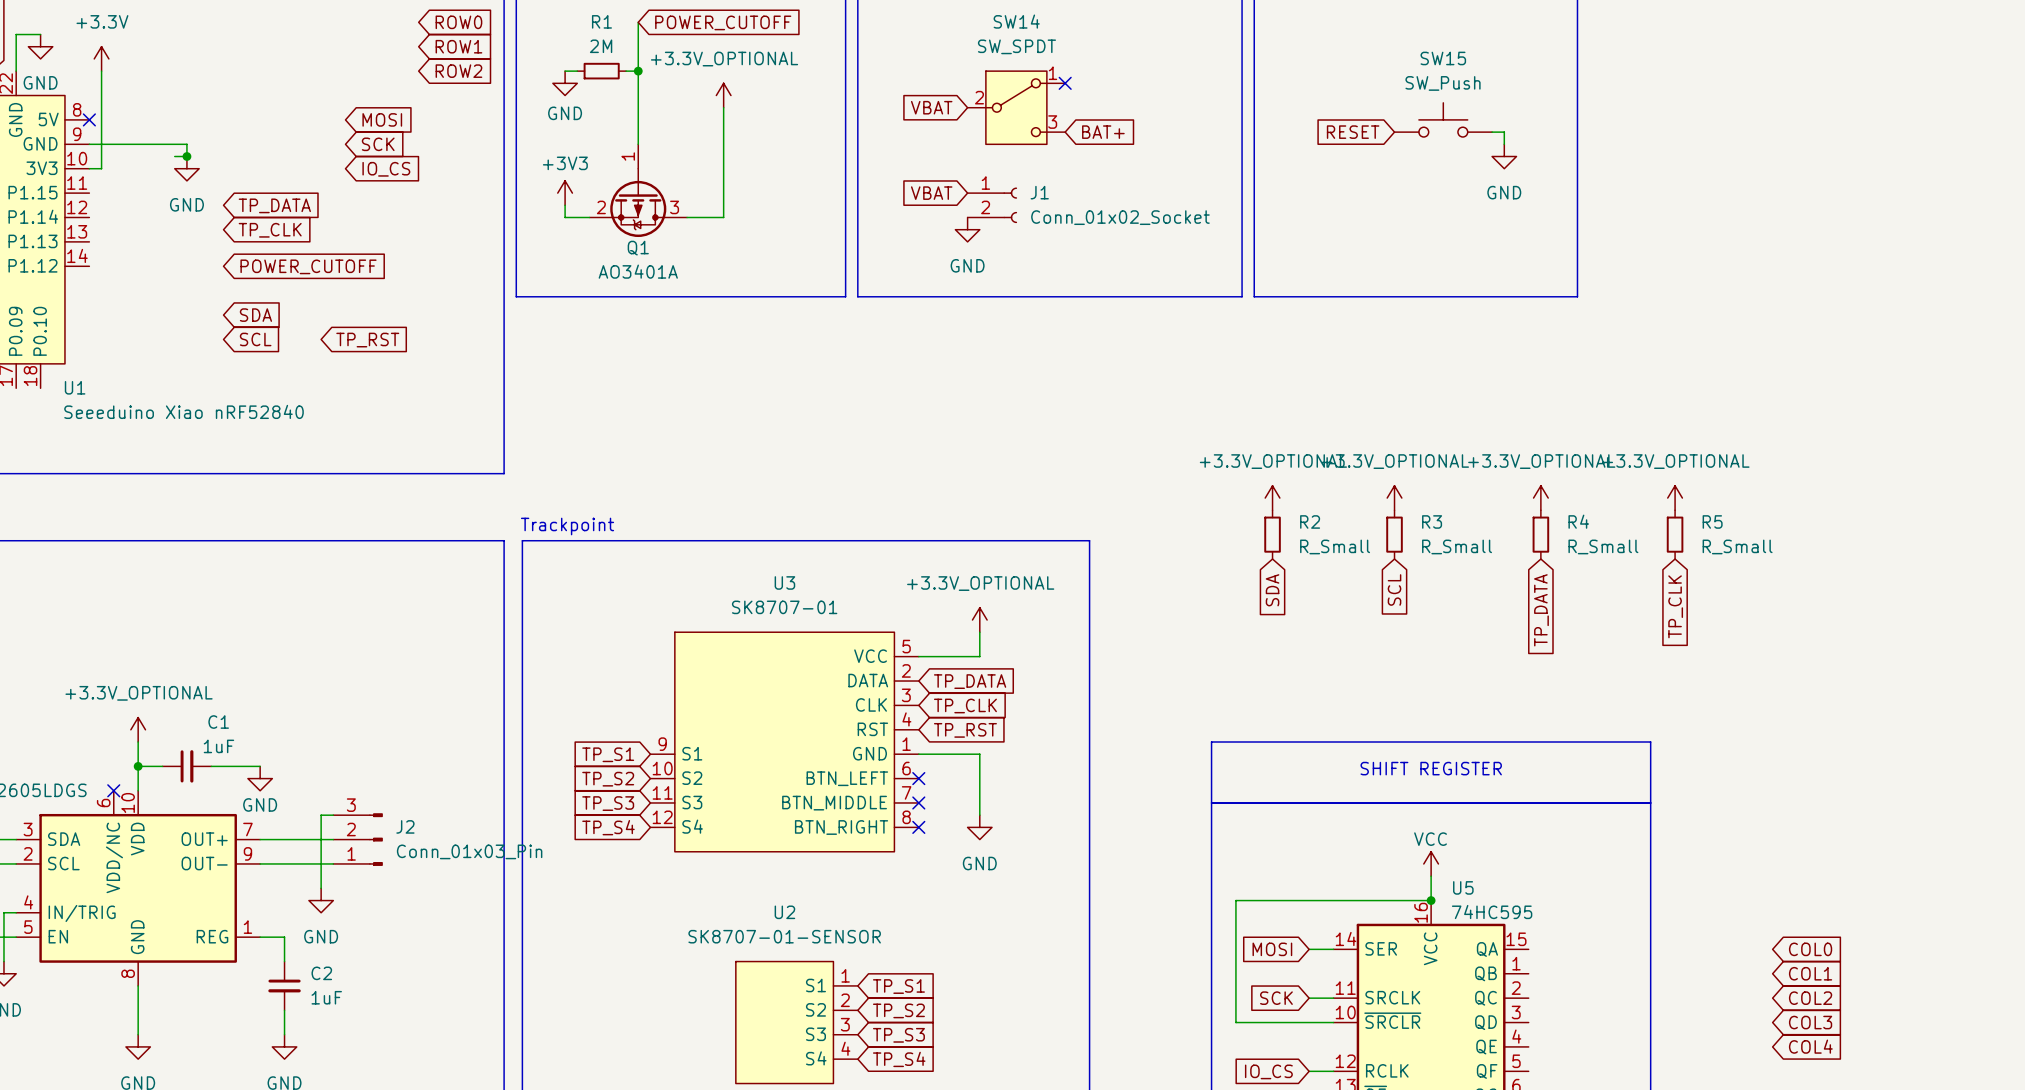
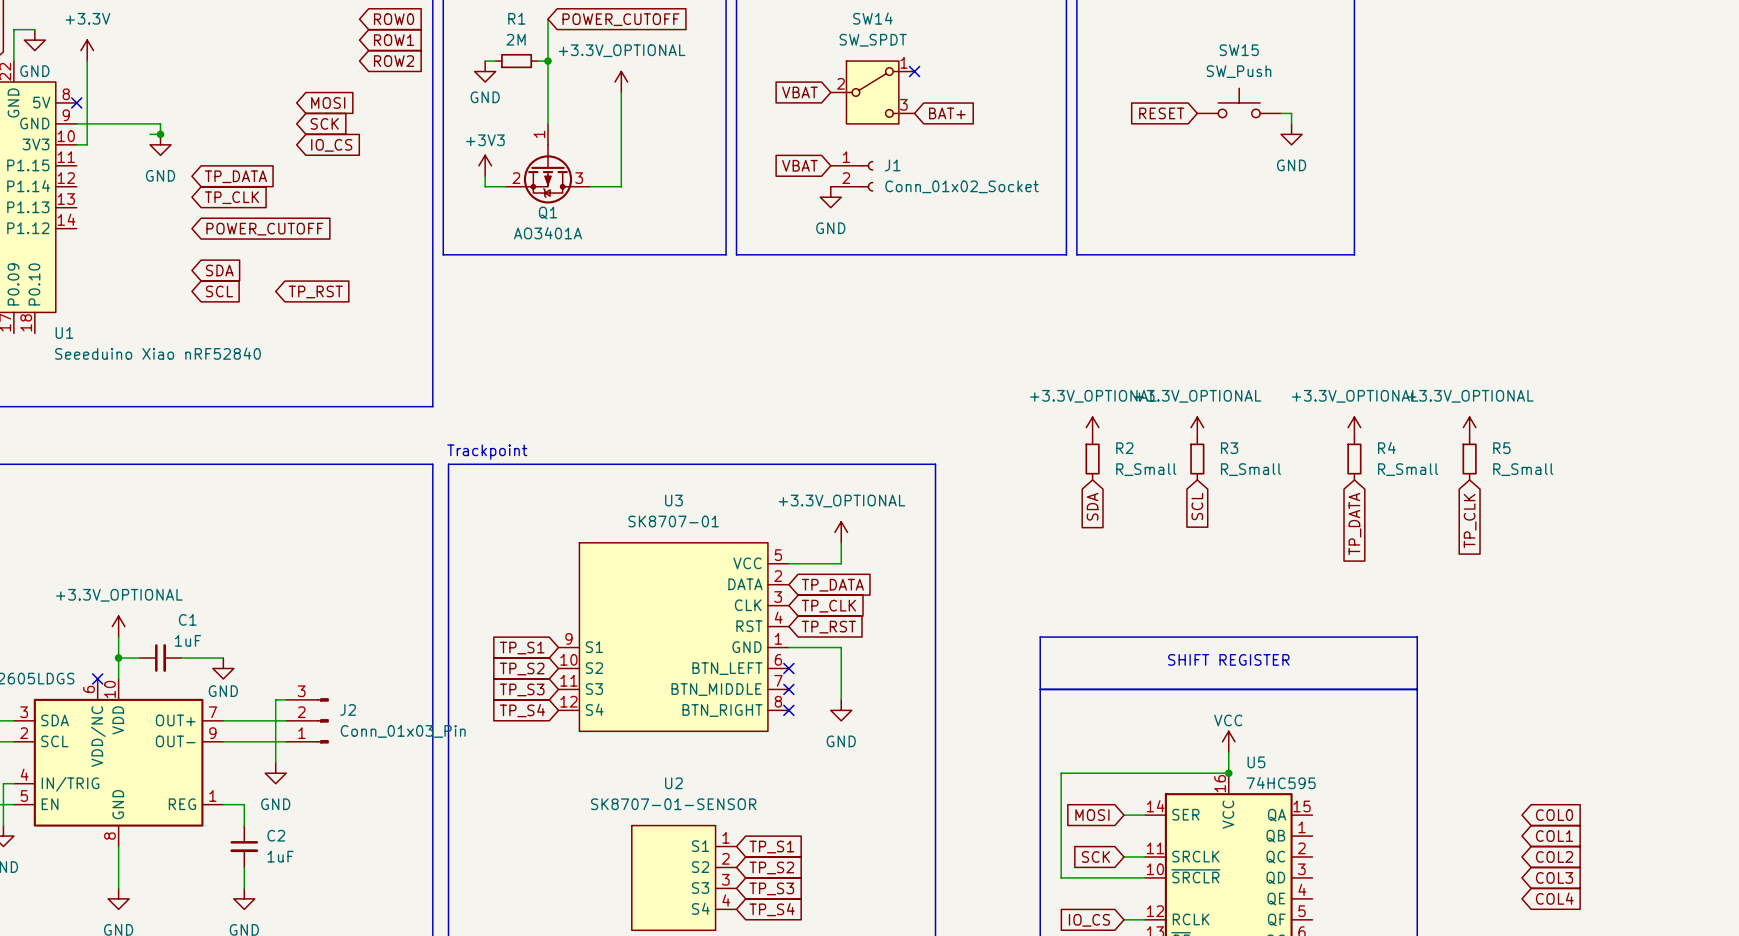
power symbol position: +3.3V_OPTIONAL (1540, 498) -> +3.3V_OPTIONAL (1354, 427)
power symbol position: +3.3V_OPTIONAL (1675, 498) -> +3.3V_OPTIONAL (1469, 427)
R4 position: (1540, 534) -> (1354, 459)
R5 position: (1675, 534) -> (1469, 459)
global label position: TP_CLK (1675, 606) -> TP_CLK (1470, 521)
global label position: TP_DATA (1541, 610) -> TP_DATA (1354, 524)

